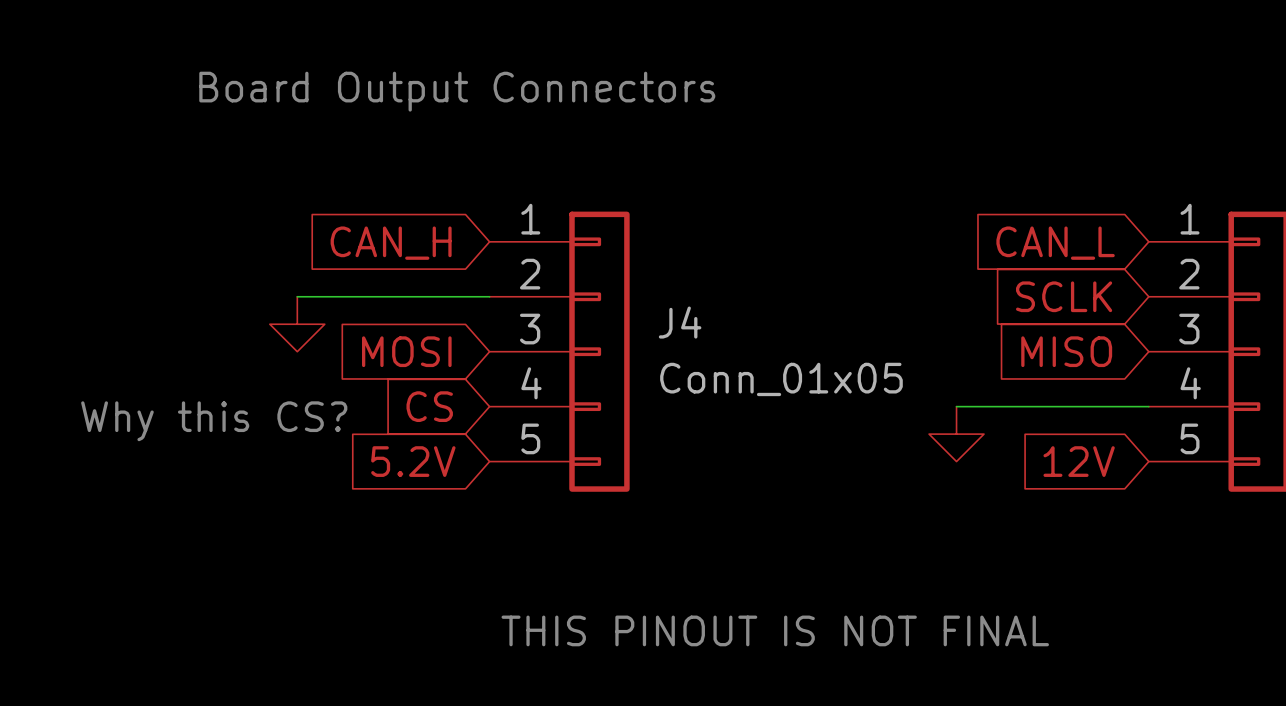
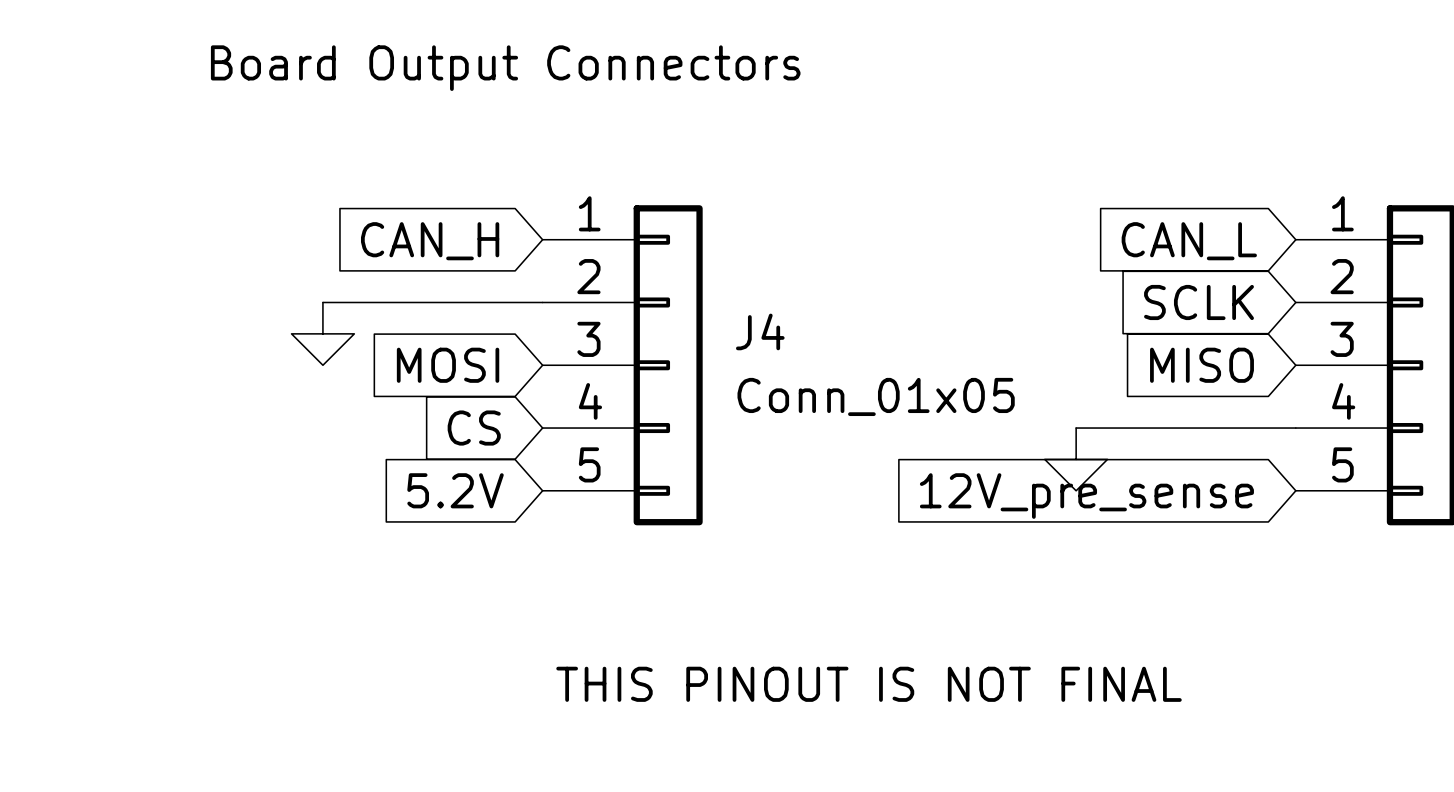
text: Why this CS? (214, 421) -> none
global label: 12V (1079, 461) -> 12V_pre_sense (1086, 496)

